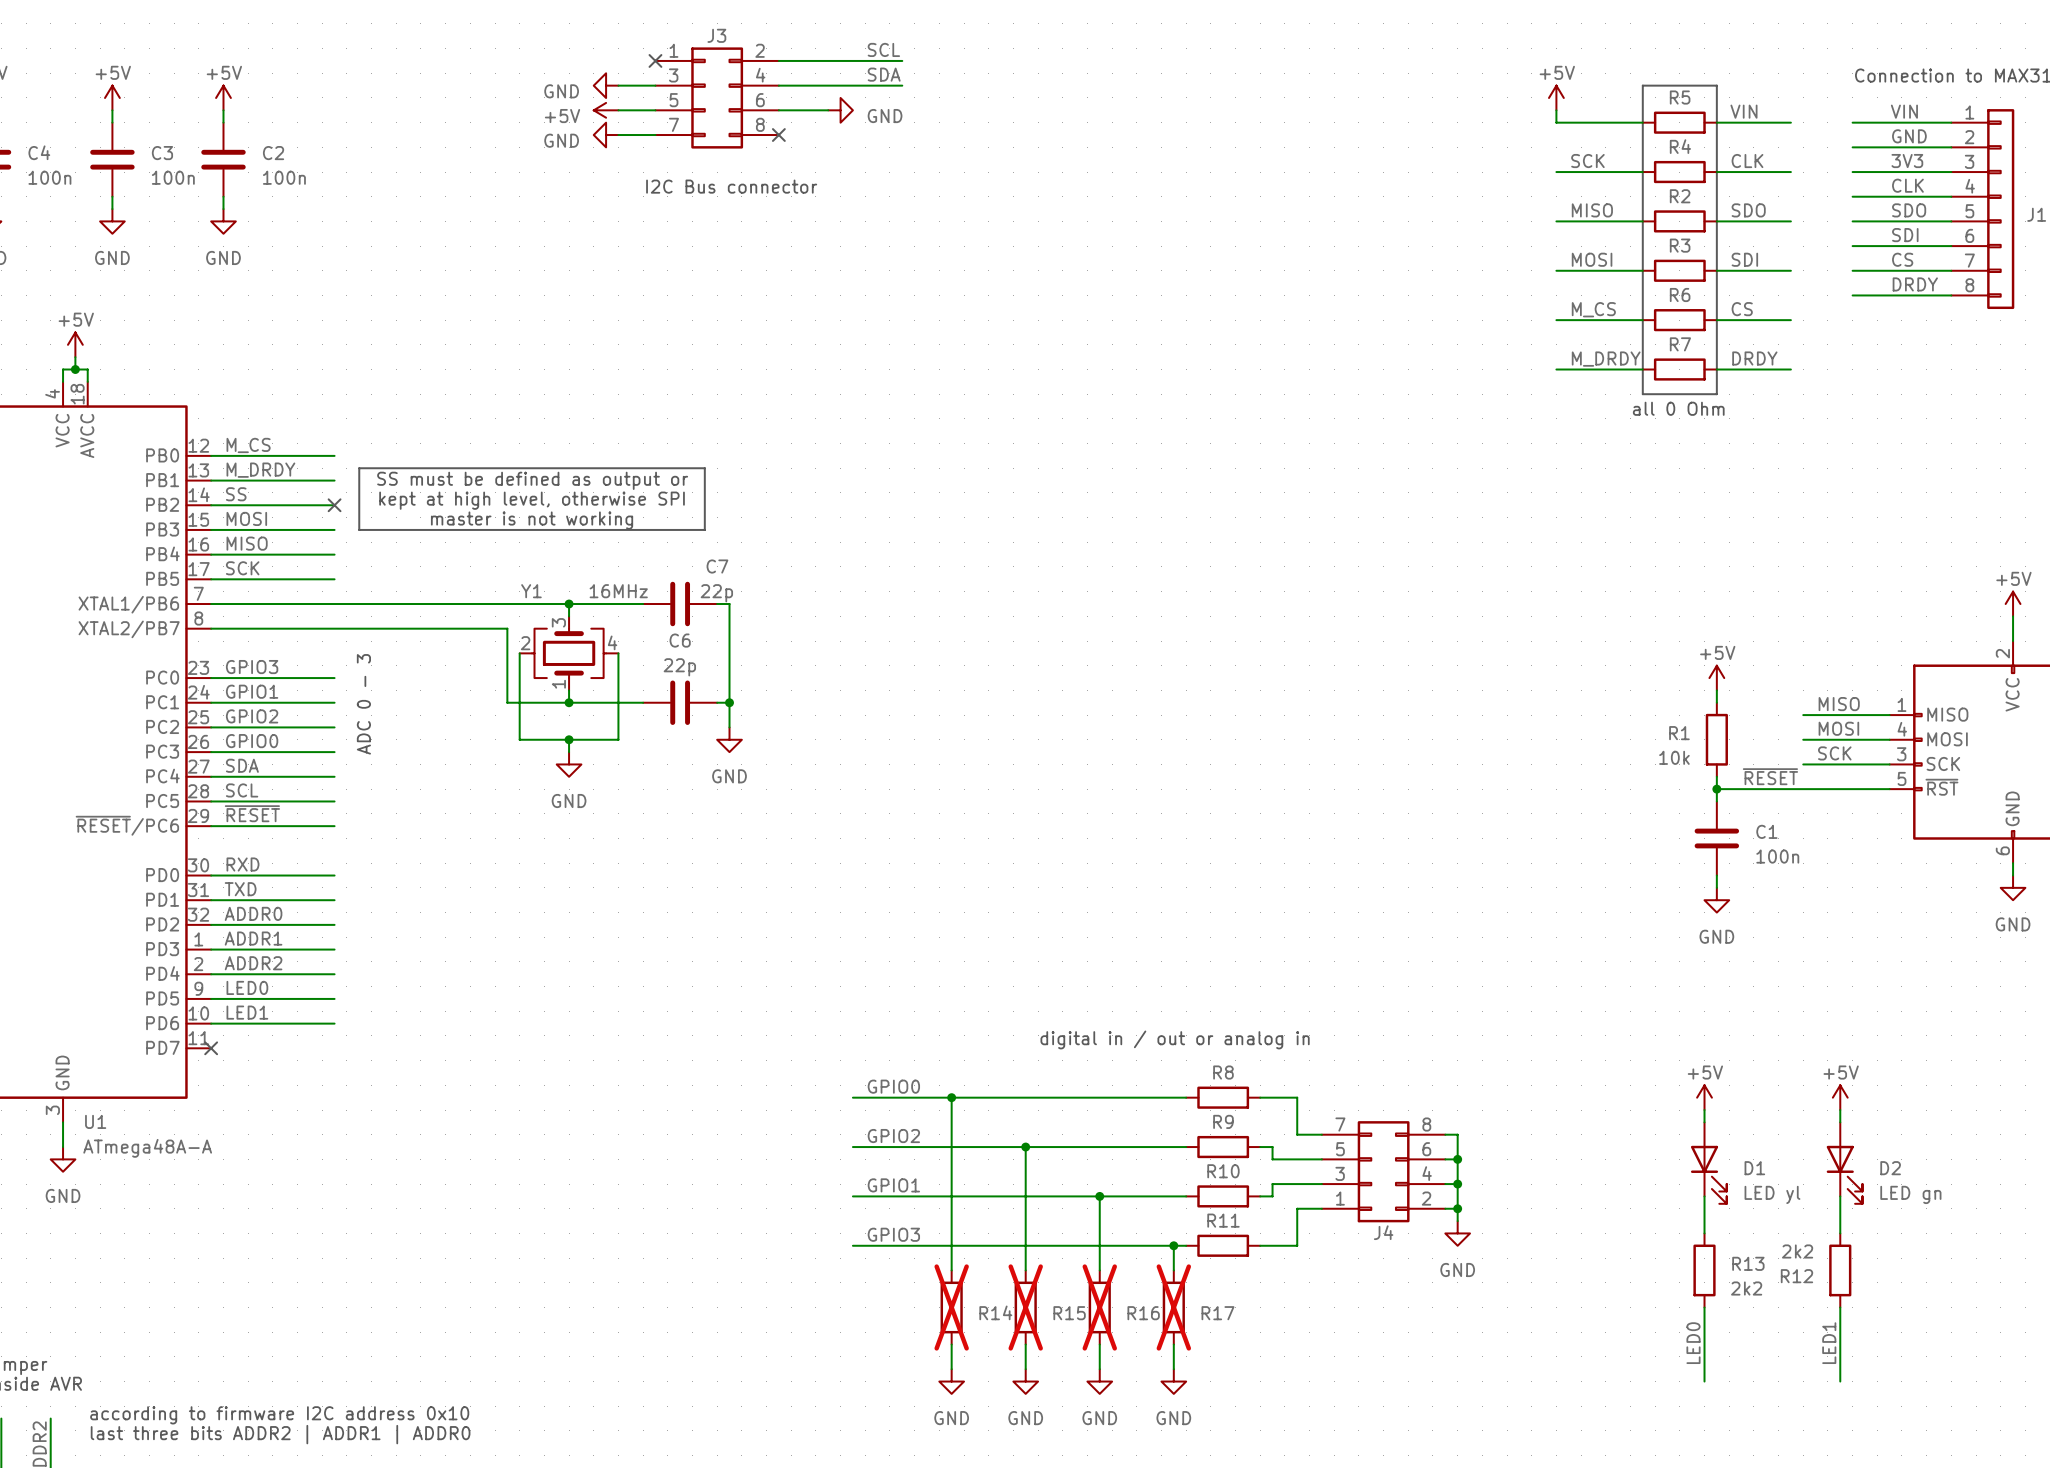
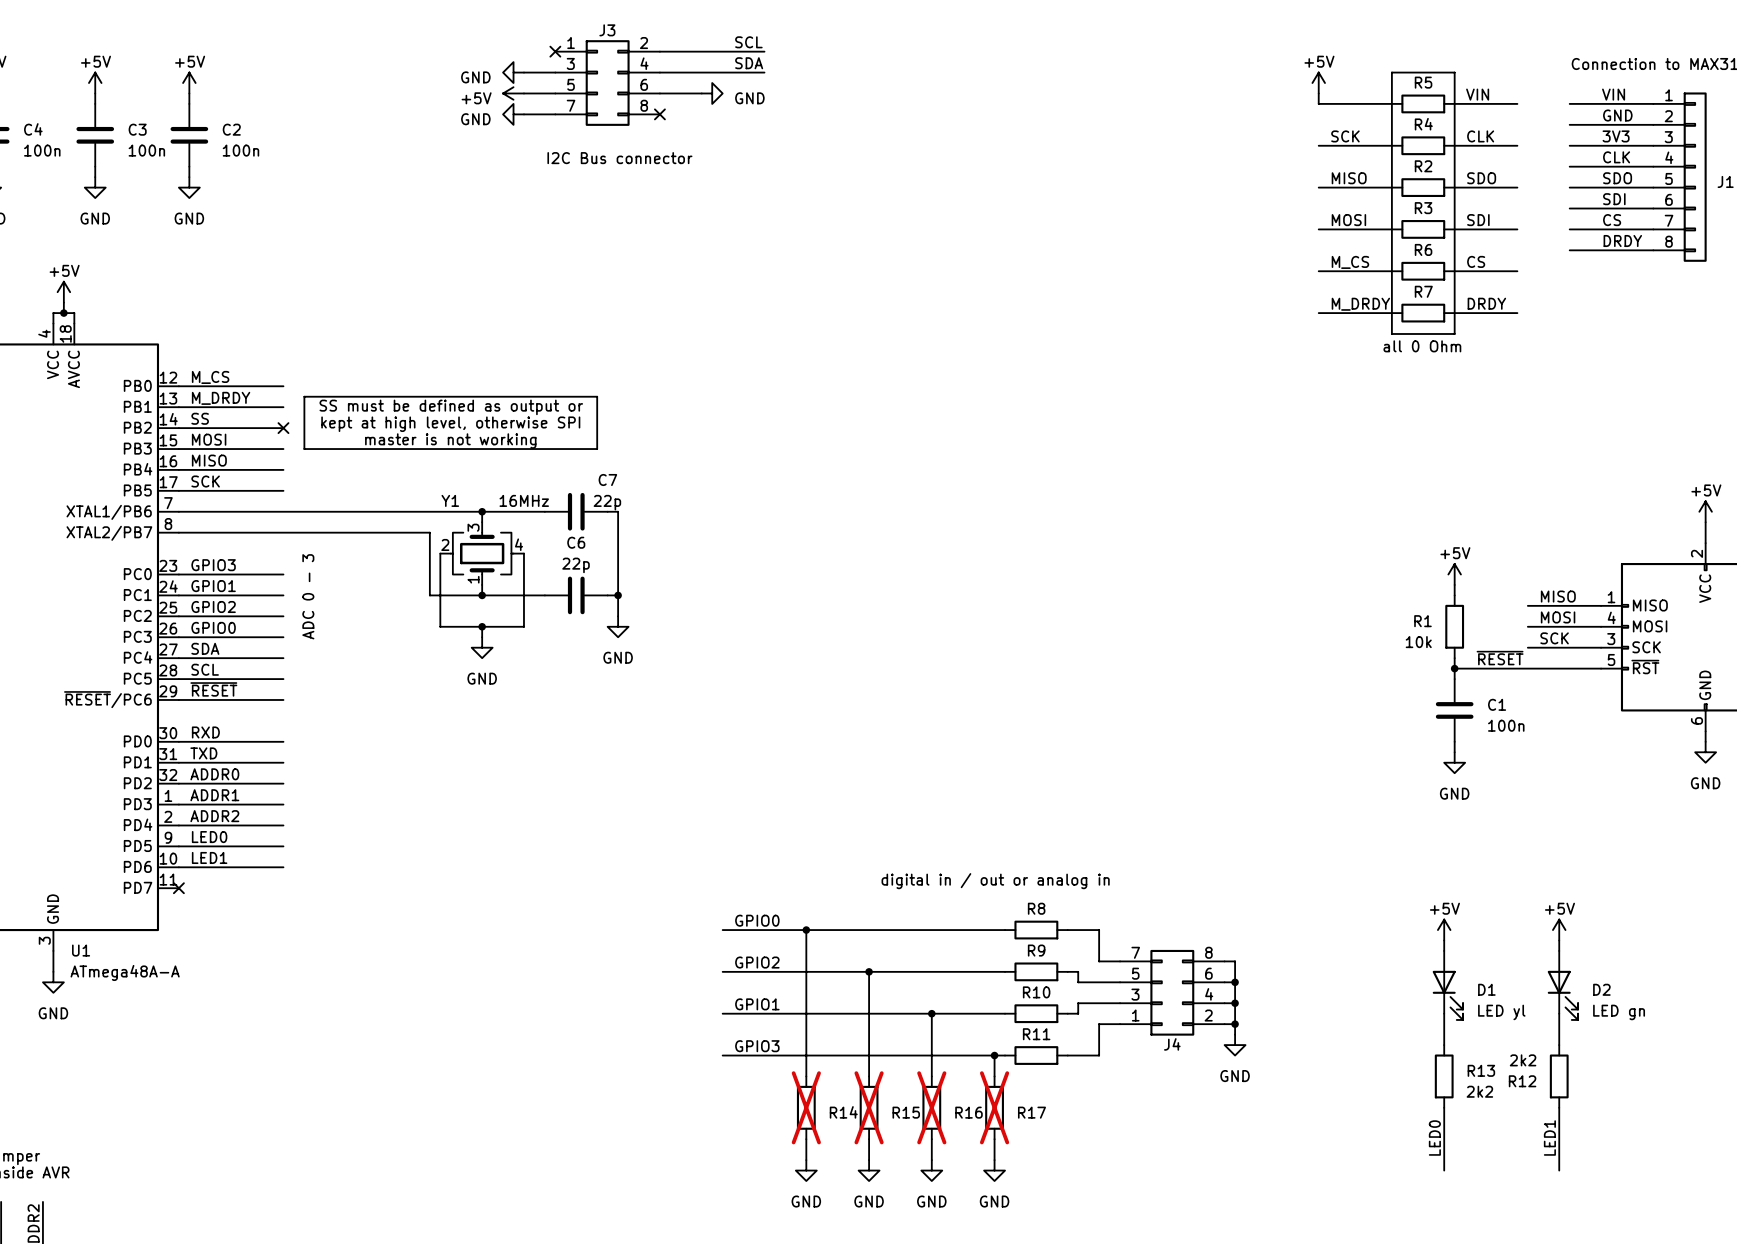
text: according to firmware I2C address 0x10 (279, 1415) -> none
text: last three bits ADDR2 | ADDR1 | ADDR0 (280, 1434) -> none

